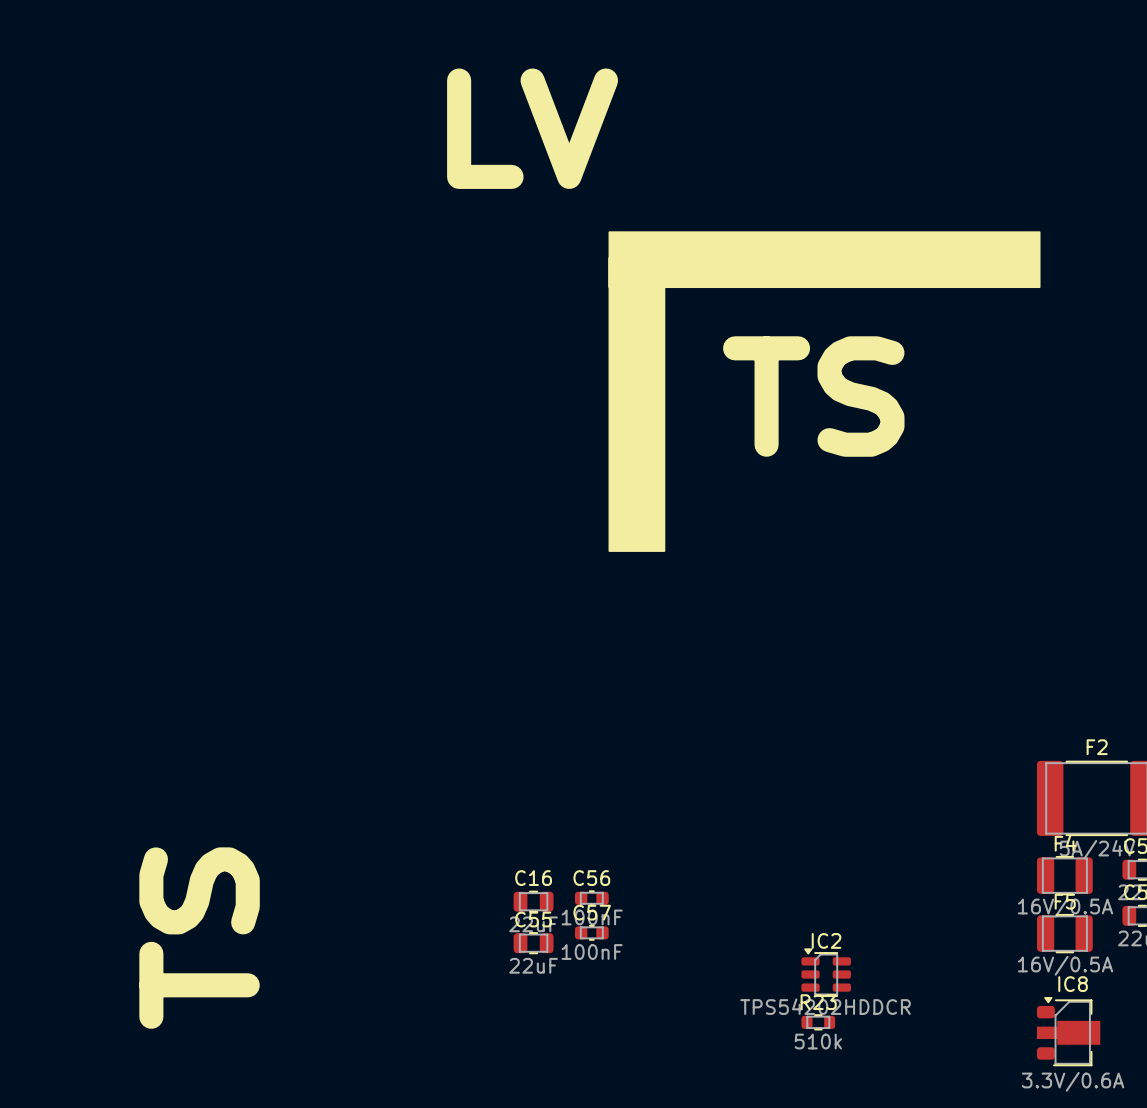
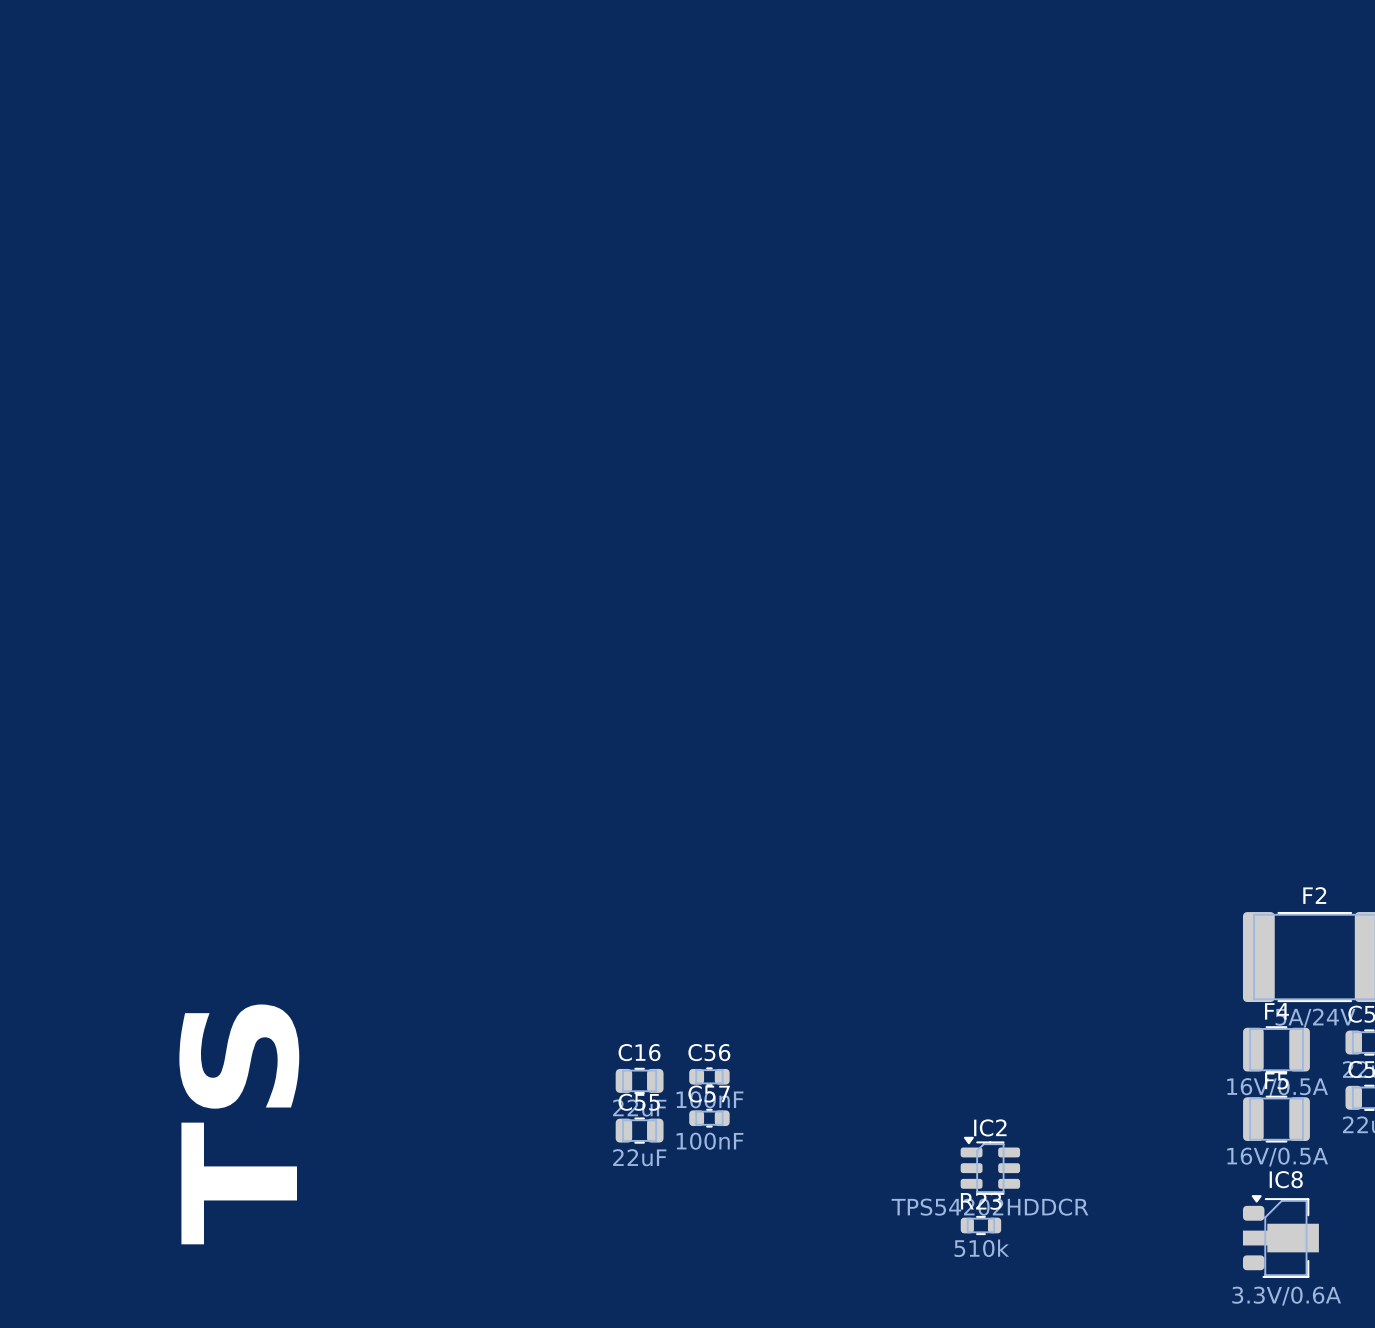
text: LV (532, 128) -> none
drawing: [608, 231, 1041, 552] -> none
text: TS (813, 396) -> none

